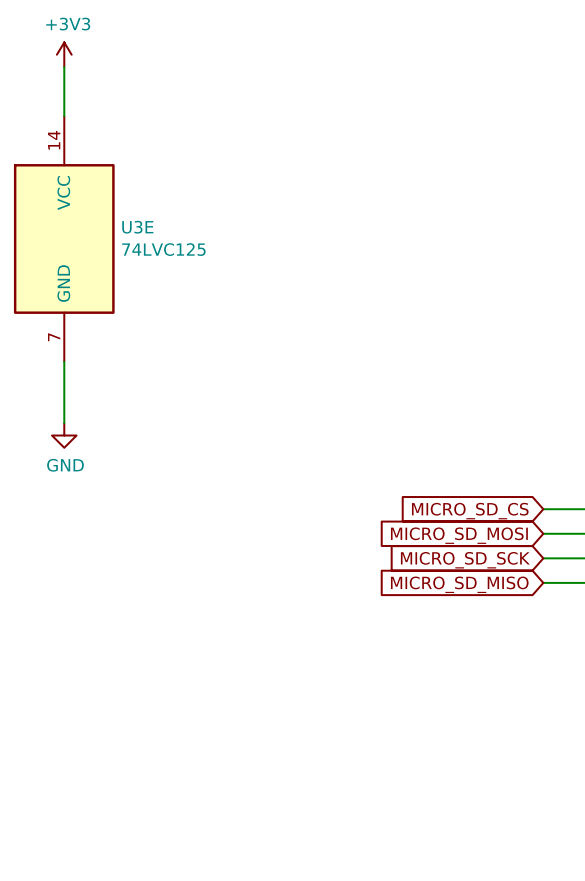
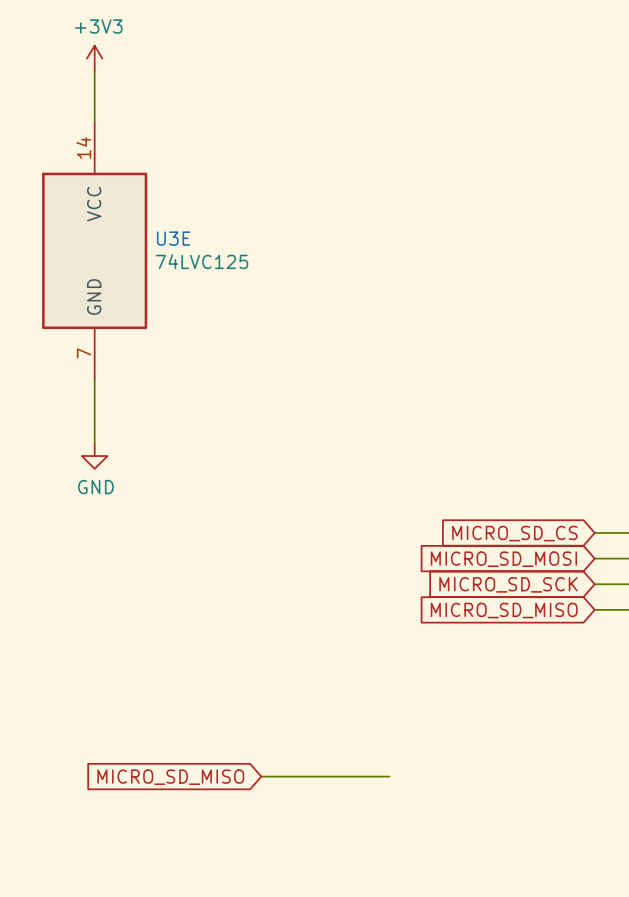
wire: none -> (261, 776) (389, 776)
global label: none -> MICRO_SD_MISO (170, 777)

